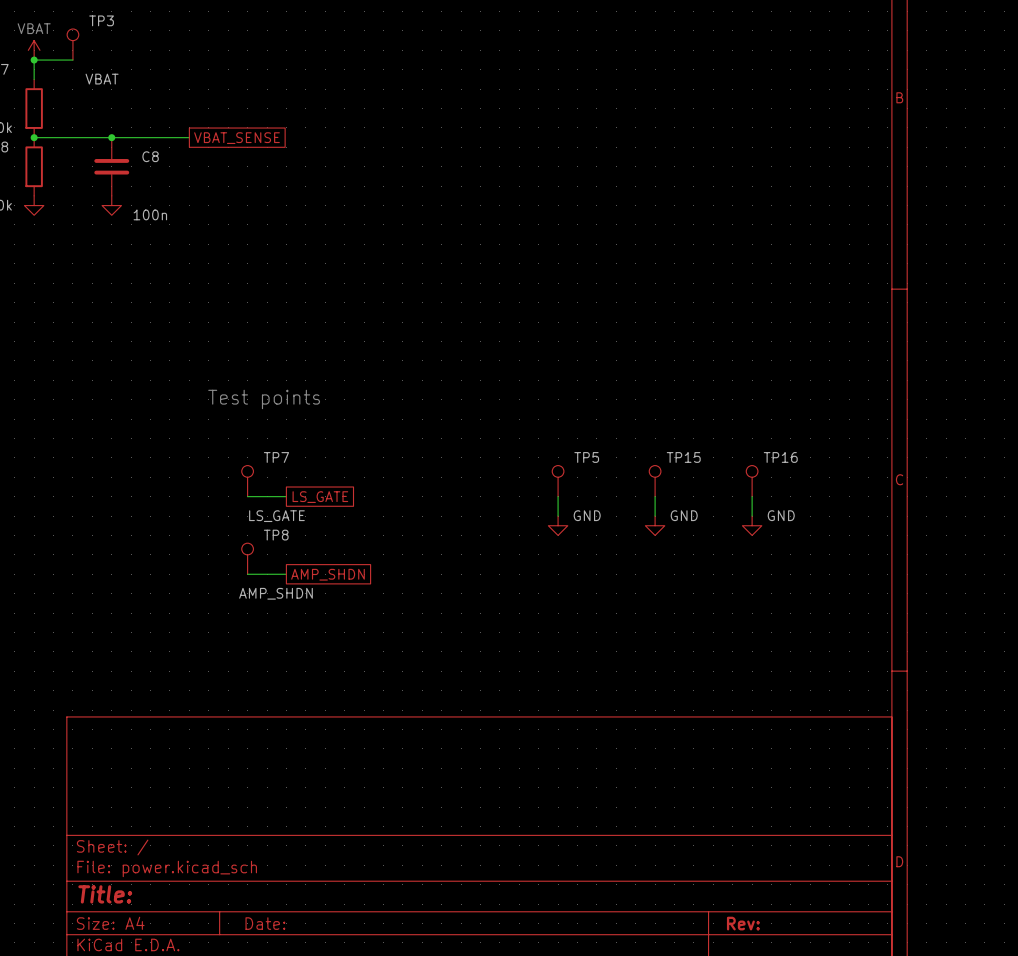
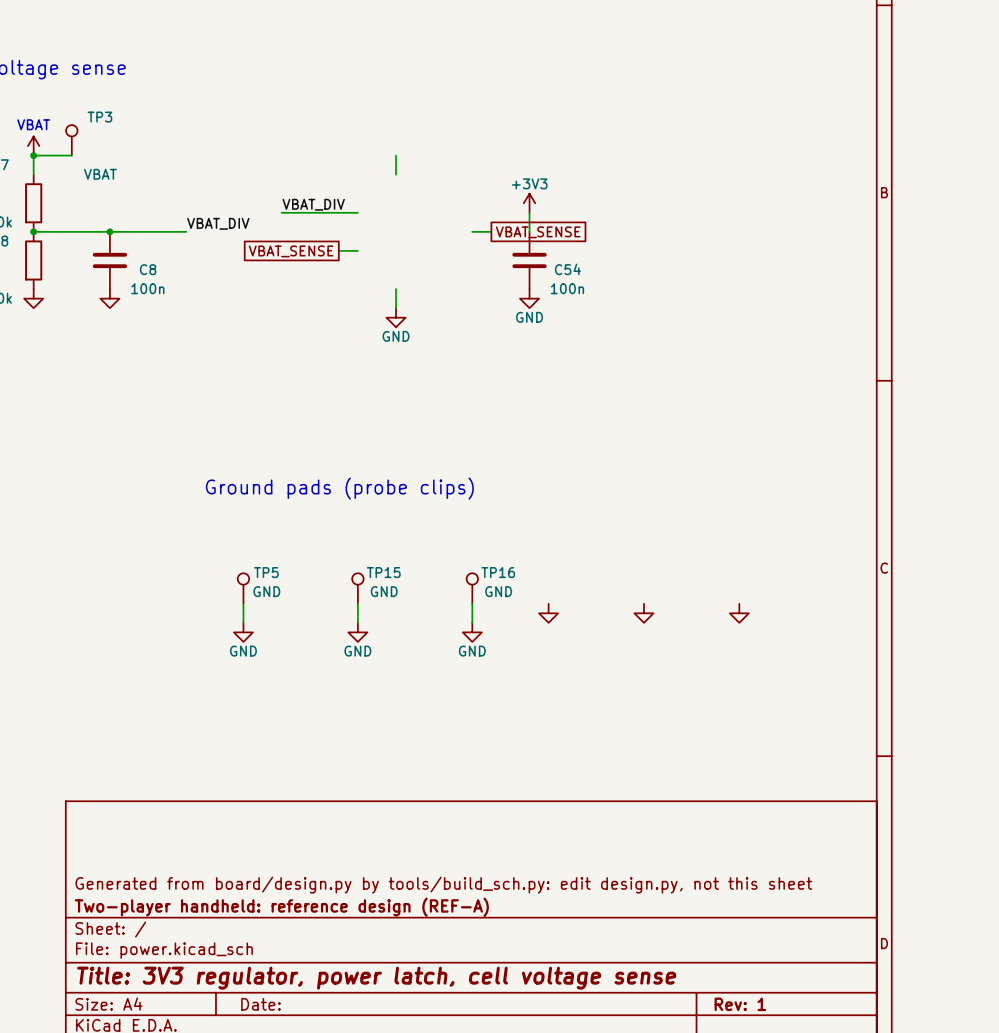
wire: none -> (396, 155) (396, 174)
power symbol: none -> +3V3 (529, 203)
label: none -> VBAT_DIV (313, 204)
wire: none -> (281, 212) (357, 212)
wire: none -> (529, 212) (529, 231)
label: none -> VBAT_DIV (218, 223)
wire: none -> (472, 231) (491, 231)
global label rotation: 0° (236, 138) -> 180° (291, 251)
global label: none -> VBAT_SENSE (538, 232)
C8 name position: C8 (150, 156) -> C8 (148, 269)
wire: none -> (338, 250) (357, 250)
C54: none -> 100n (529, 260)
wire: none -> (396, 289) (396, 308)
power symbol: none -> GND (529, 298)
C8 value position: 100n (150, 214) -> 100n (147, 288)
power symbol: none -> GND (396, 317)
text: none -> Ground pads (probe clips) (339, 488)
text: Test points (264, 399) -> none
TP5 name position: TP5 (586, 457) -> TP5 (266, 572)
TP15 name position: TP15 (683, 457) -> TP15 (383, 572)
TP16 name position: TP16 (780, 457) -> TP16 (498, 572)
TP7: LS_GATE (247, 481) -> none
TP5 position: (558, 481) -> (243, 588)
TP15 position: (655, 481) -> (357, 588)
TP16 position: (752, 481) -> (472, 588)
wire: (247, 496) (286, 496) -> none
wire: (558, 496) (558, 516) -> (472, 603) (472, 622)
wire: (655, 496) (655, 516) -> none
wire: (752, 496) (752, 516) -> none
global label: LS_GATE (320, 497) -> none
TP5 value position: GND (587, 515) -> GND (266, 591)
TP15 value position: GND (684, 515) -> GND (384, 591)
TP16 value position: GND (781, 515) -> GND (498, 591)
wire: none -> (243, 603) (243, 622)
wire: none -> (357, 603) (357, 622)
power symbol: none -> GND (243, 632)
power symbol: none -> GND (357, 632)
power symbol: none -> GND (472, 632)
TP8: AMP_SHDN (247, 558) -> none
wire: (247, 574) (286, 574) -> none
global label: AMP_SHDN (328, 574) -> none
title block: none -> Generated from board/design.py by tools/build_sch.py: edit design.py, not this sheet (443, 885)
title block: none -> Two-player handheld: reference design (REF-A) (281, 907)
title block: Title: (105, 894) -> Title: 3V3 regulator, power latch, cell voltage sense (376, 978)
title block: Rev: (743, 923) -> Rev: 1 (740, 1004)

